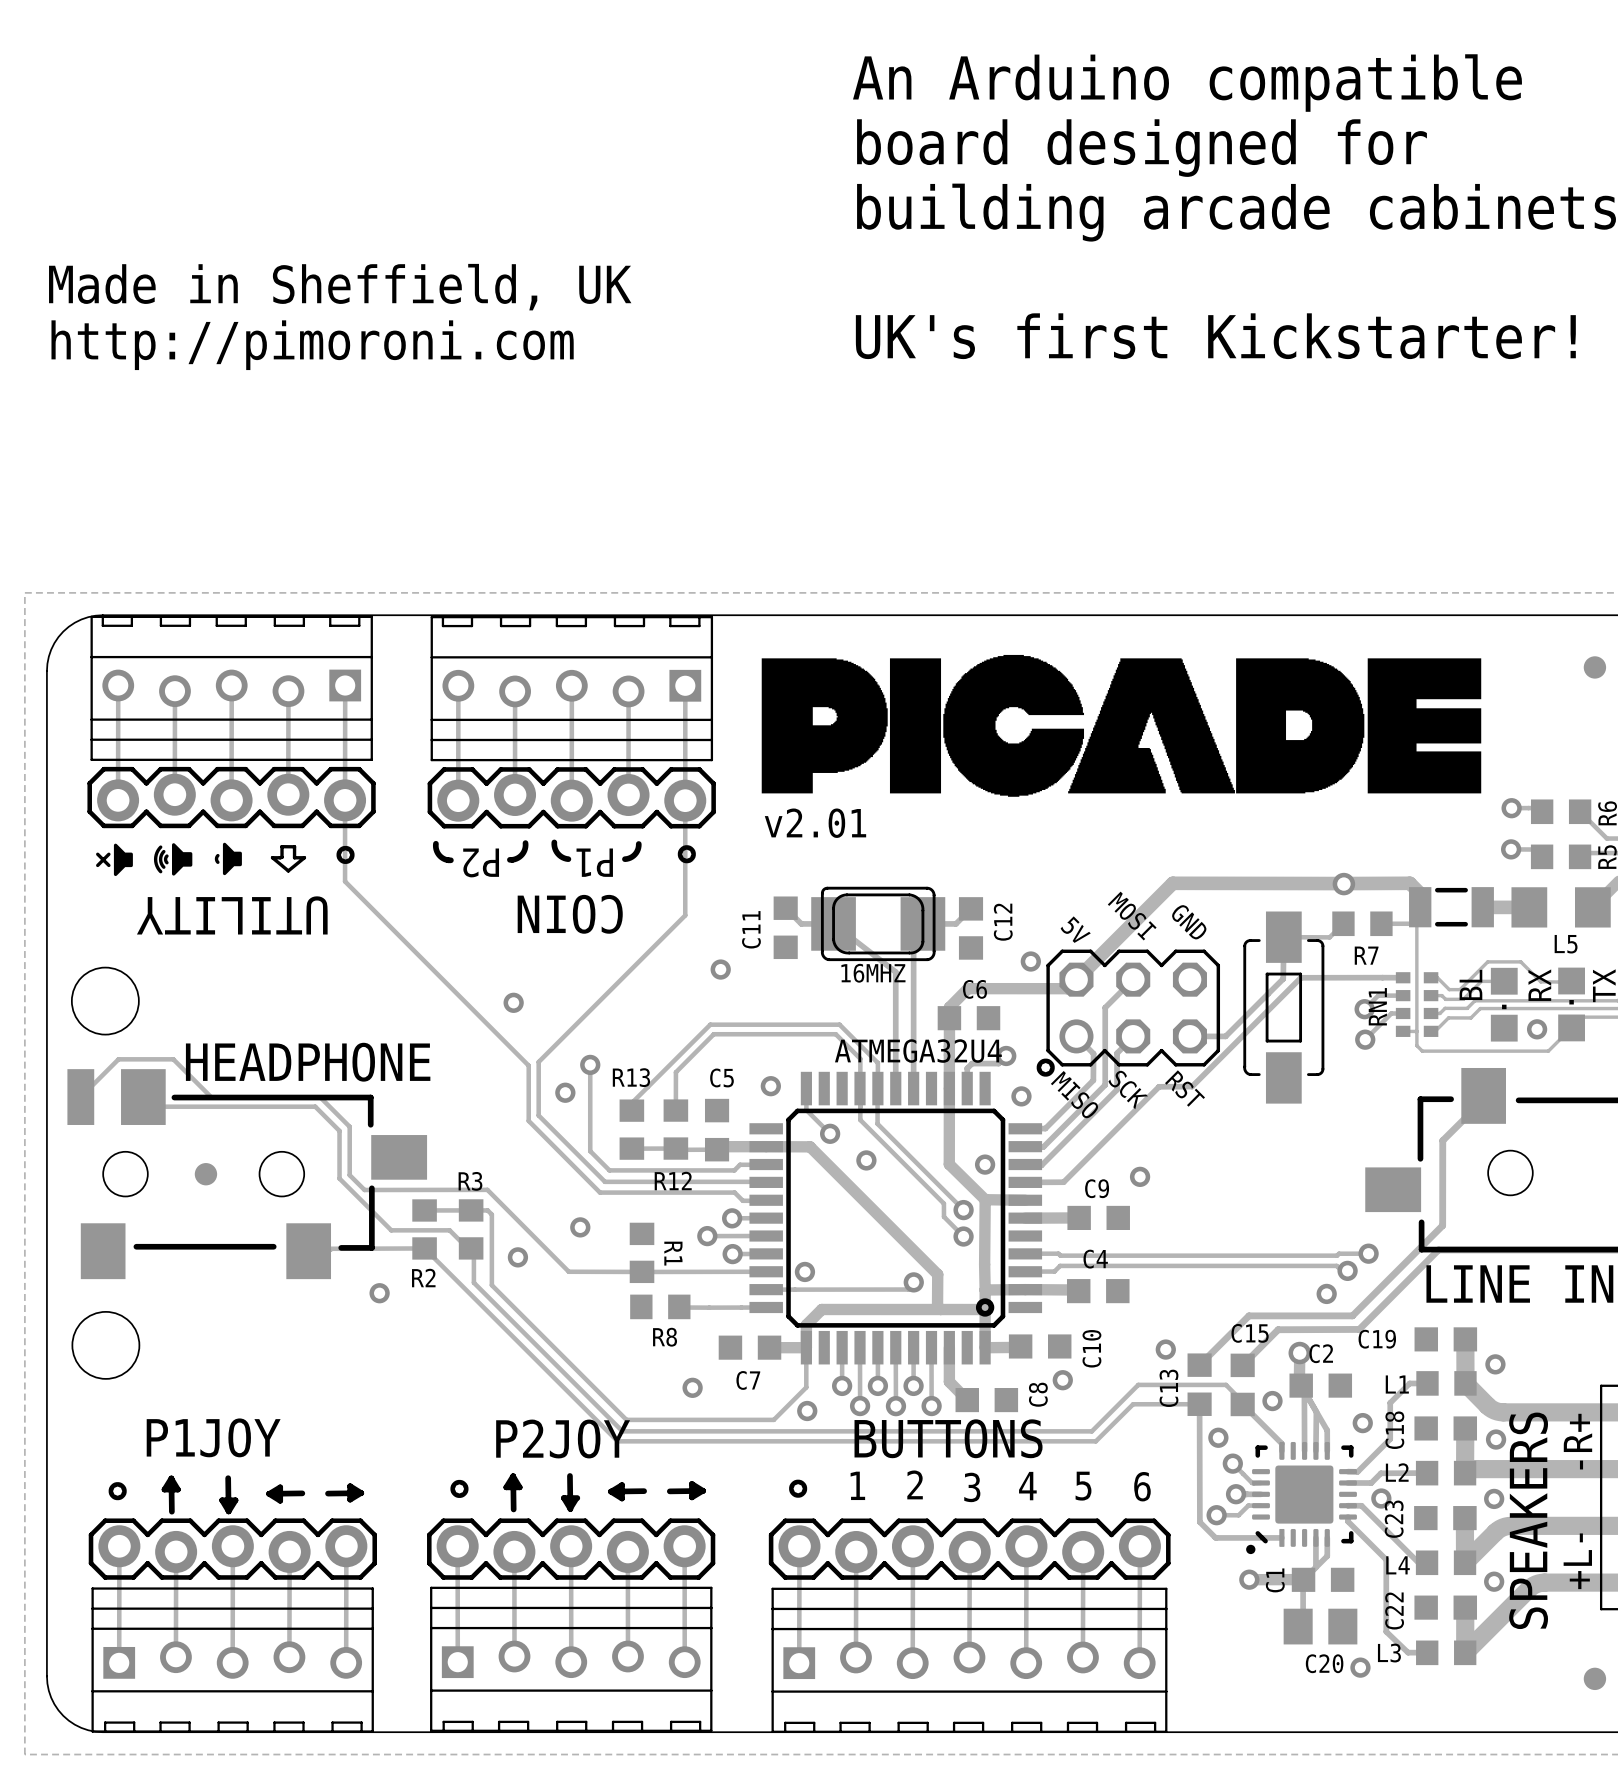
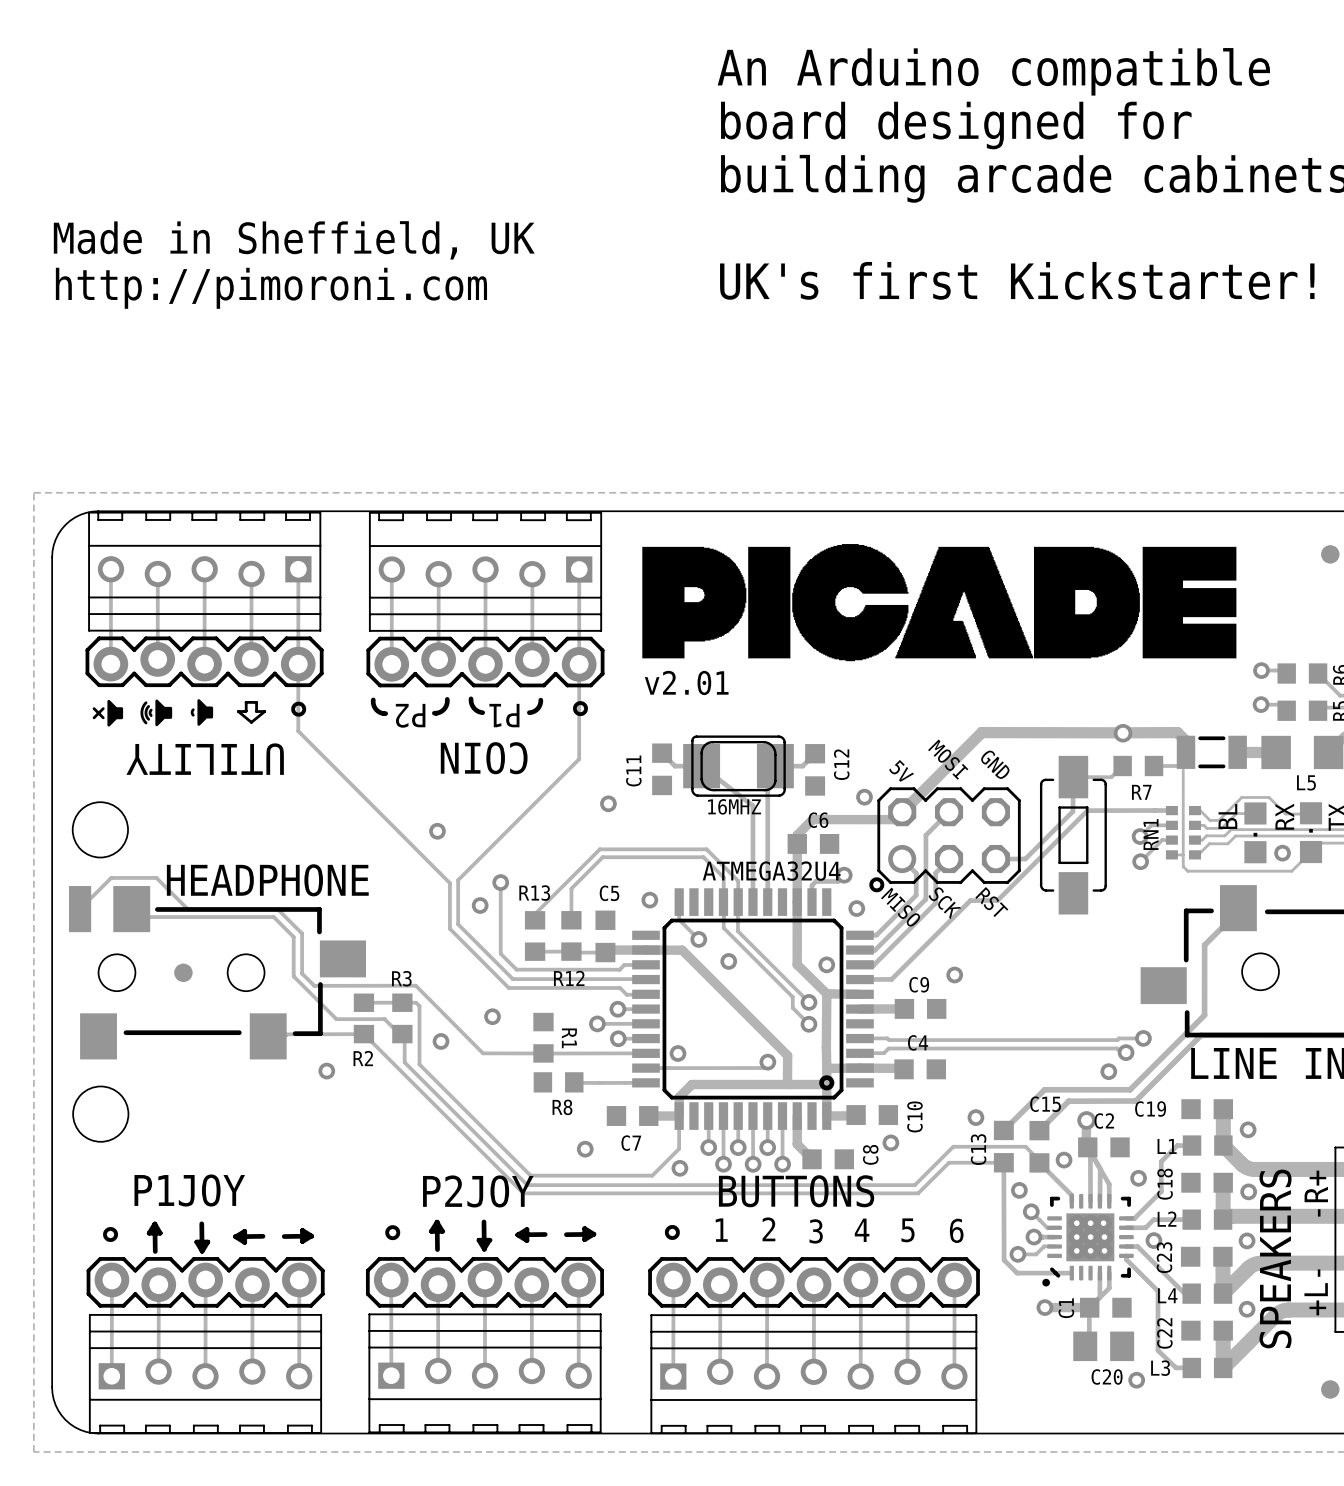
part footprint: [1246, 1441, 1357, 1555] -> [1042, 1193, 1134, 1287]

